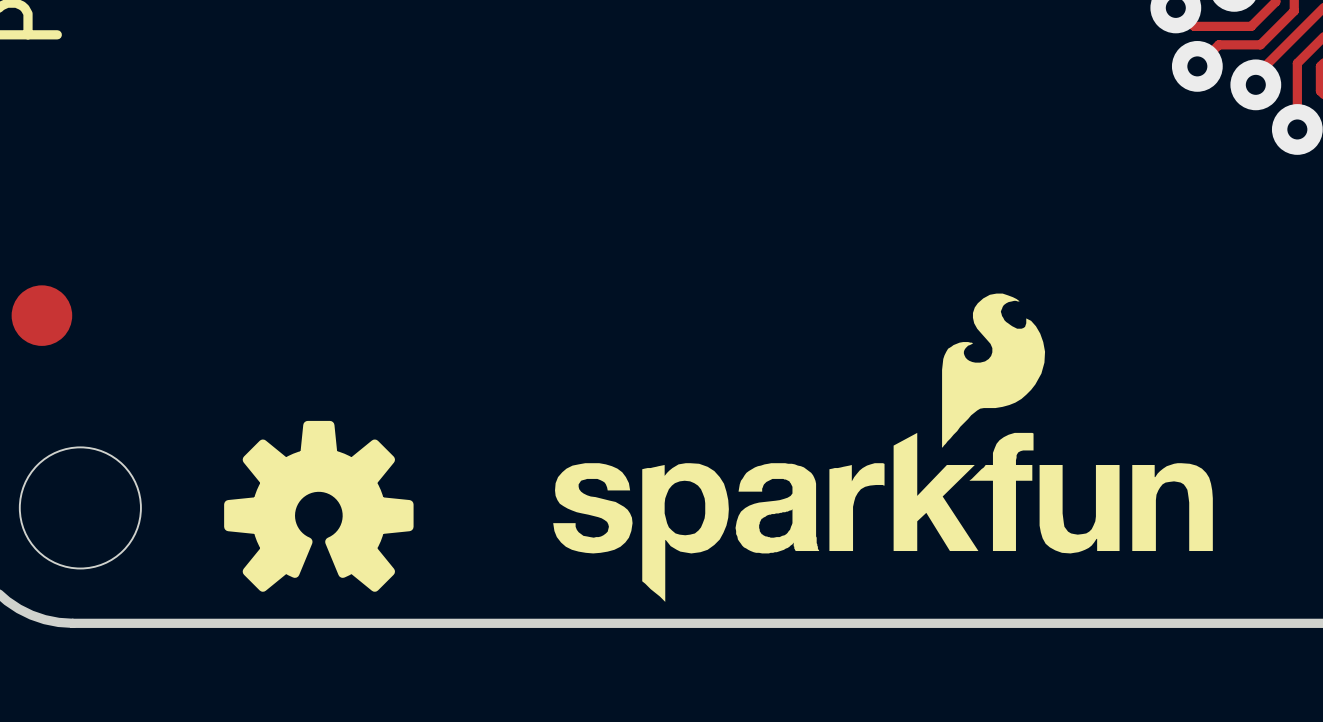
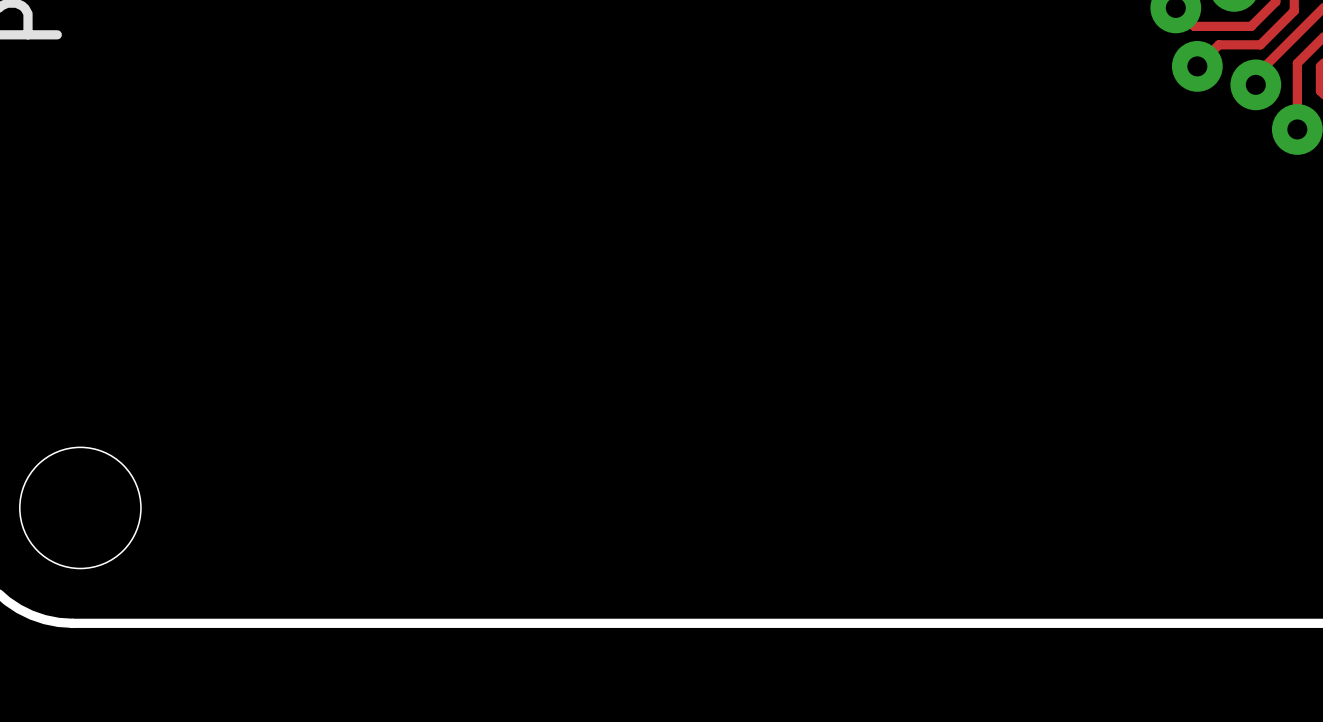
drawing: [553, 293, 1213, 602] -> none
part: (41, 315) -> none
drawing: [224, 420, 414, 592] -> none

